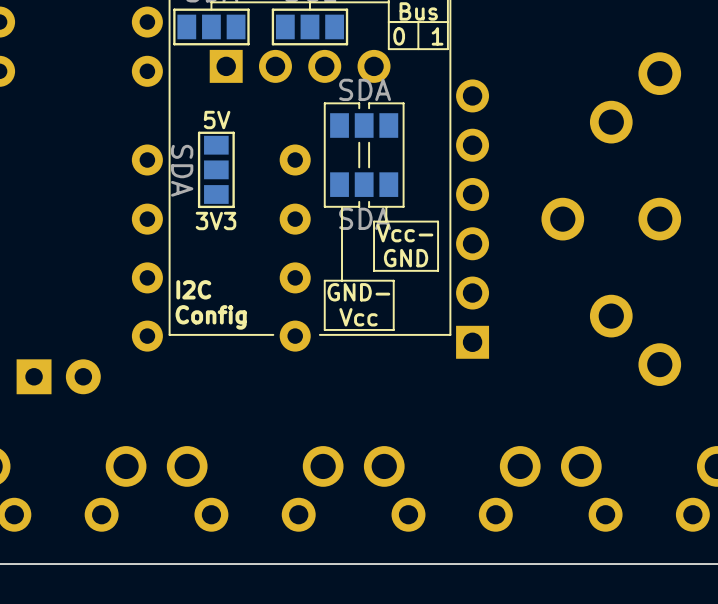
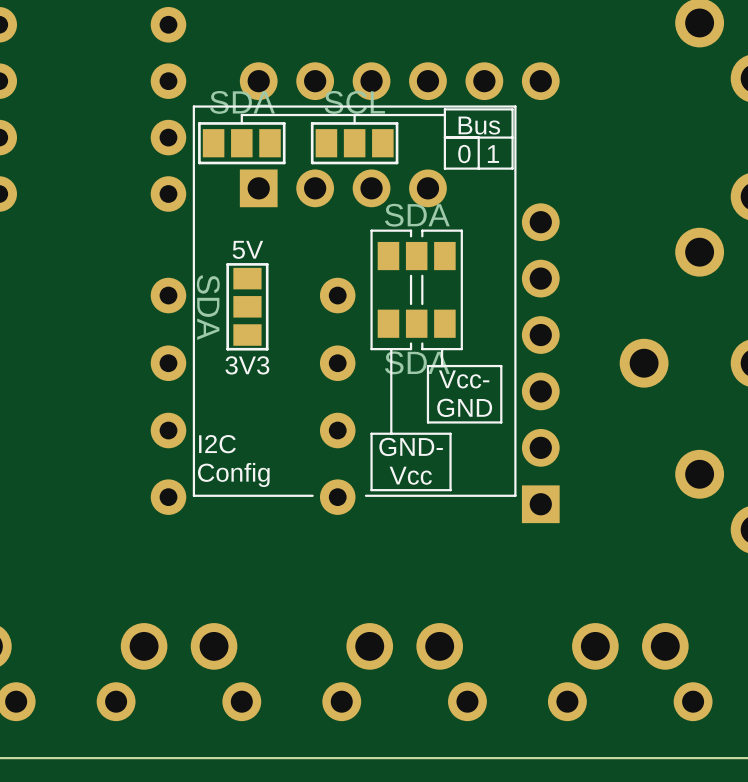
part: (58, 376) -> none

